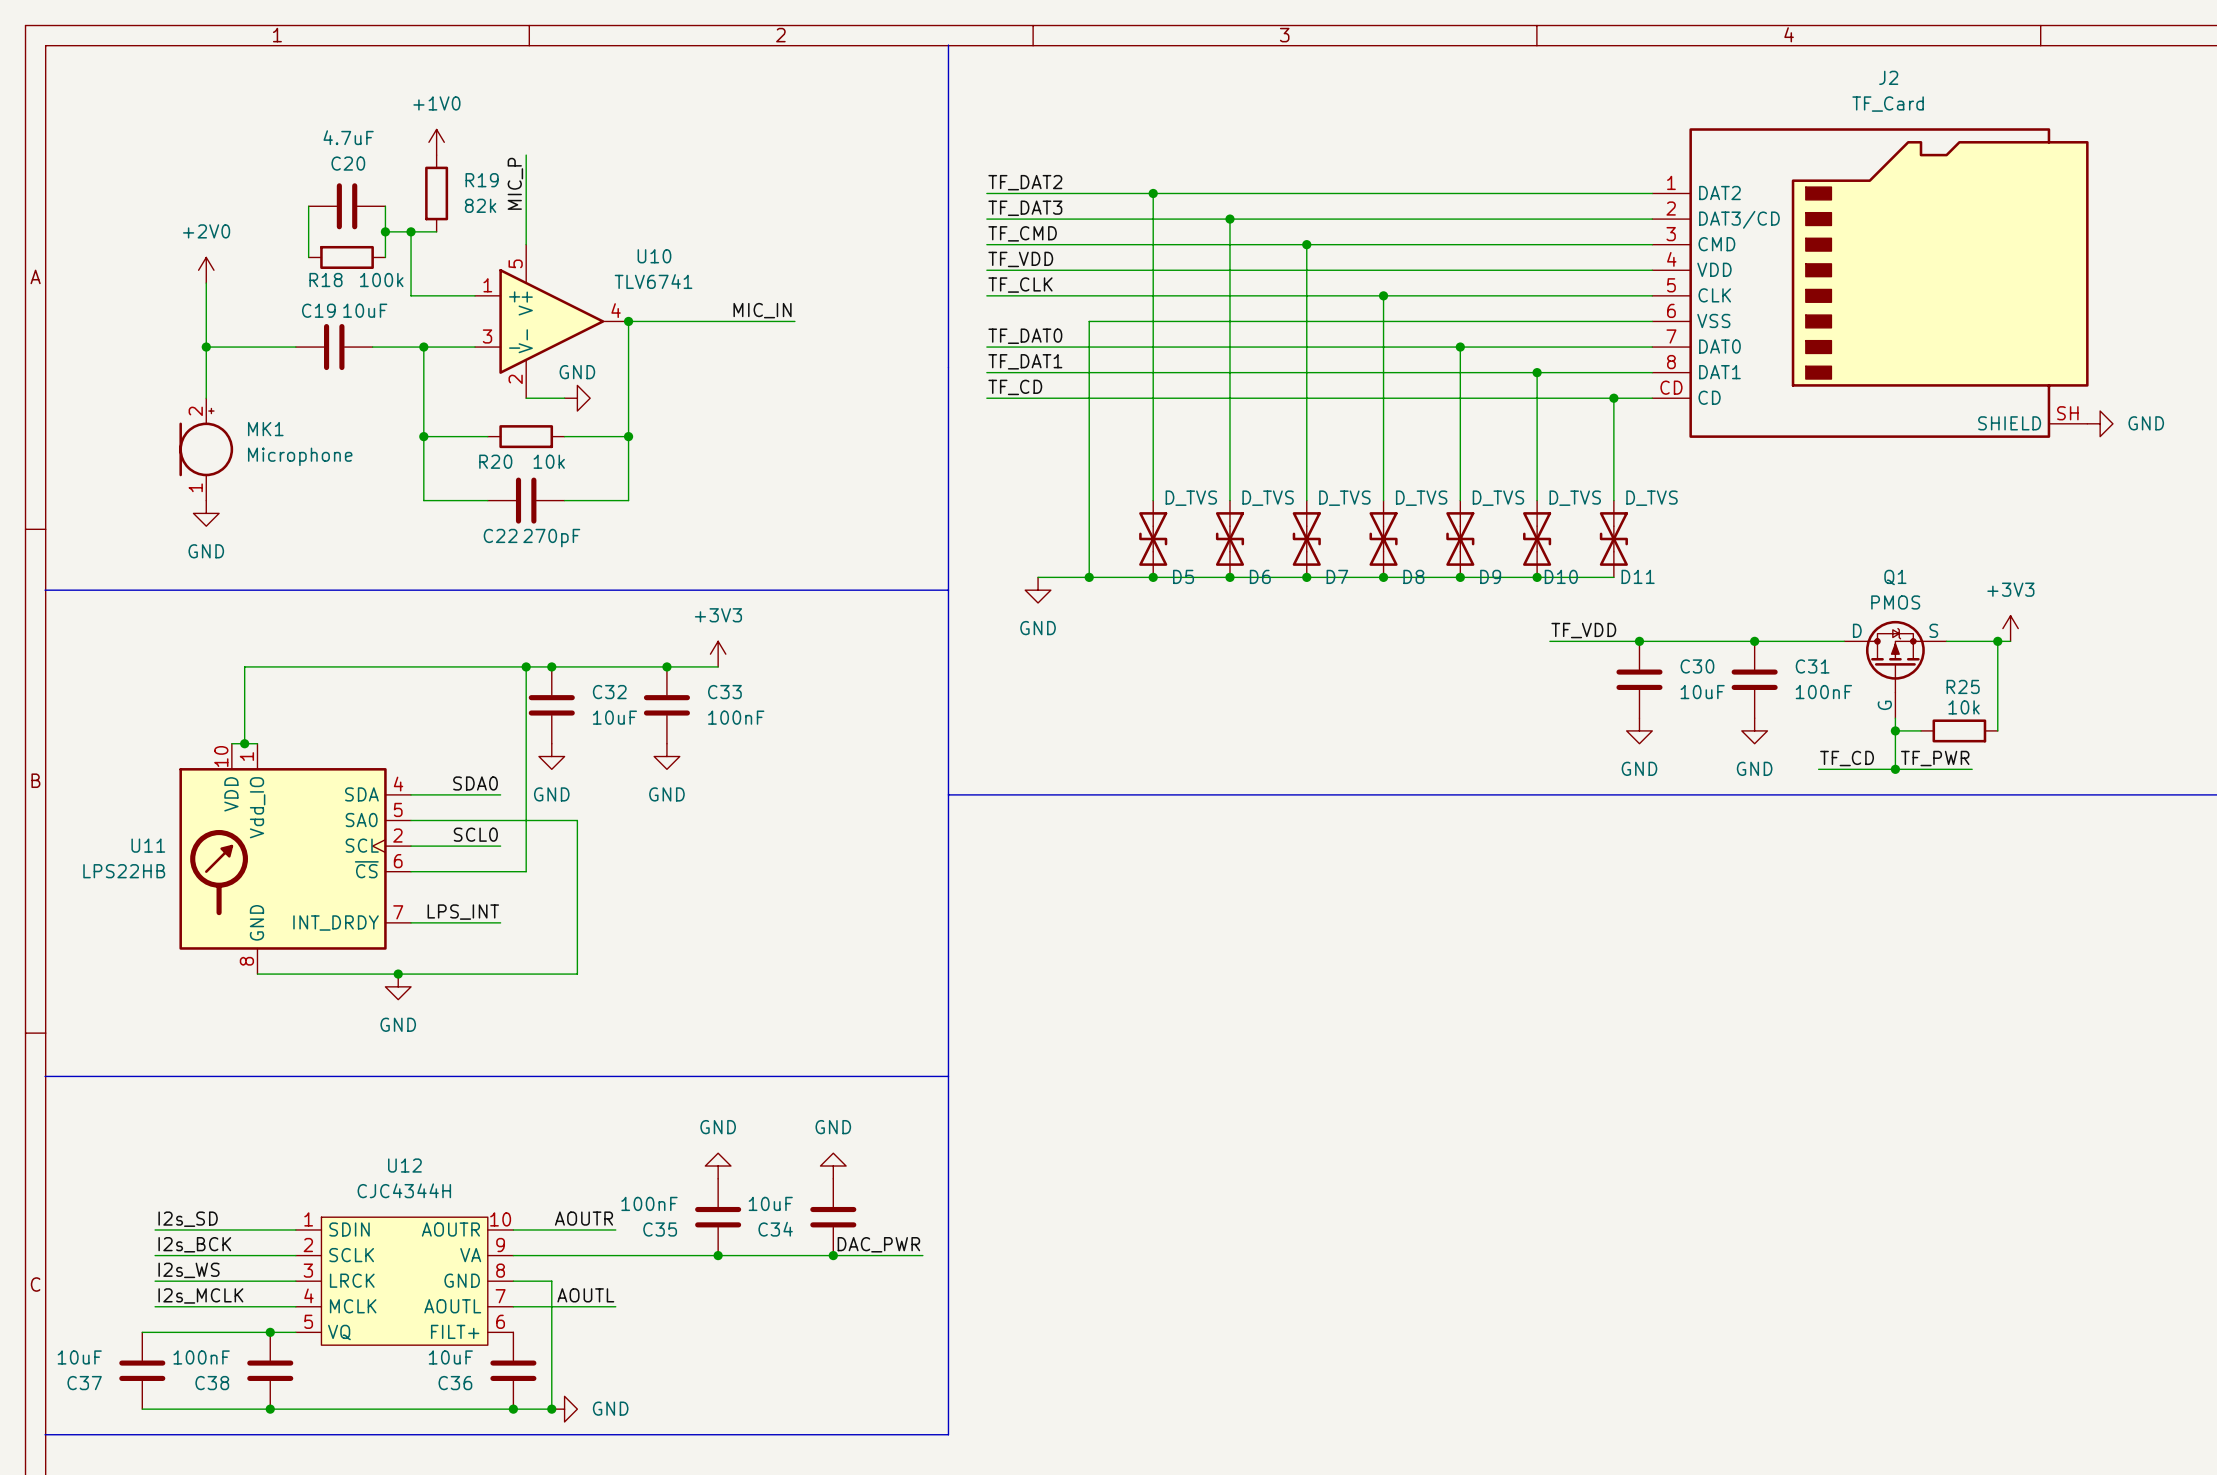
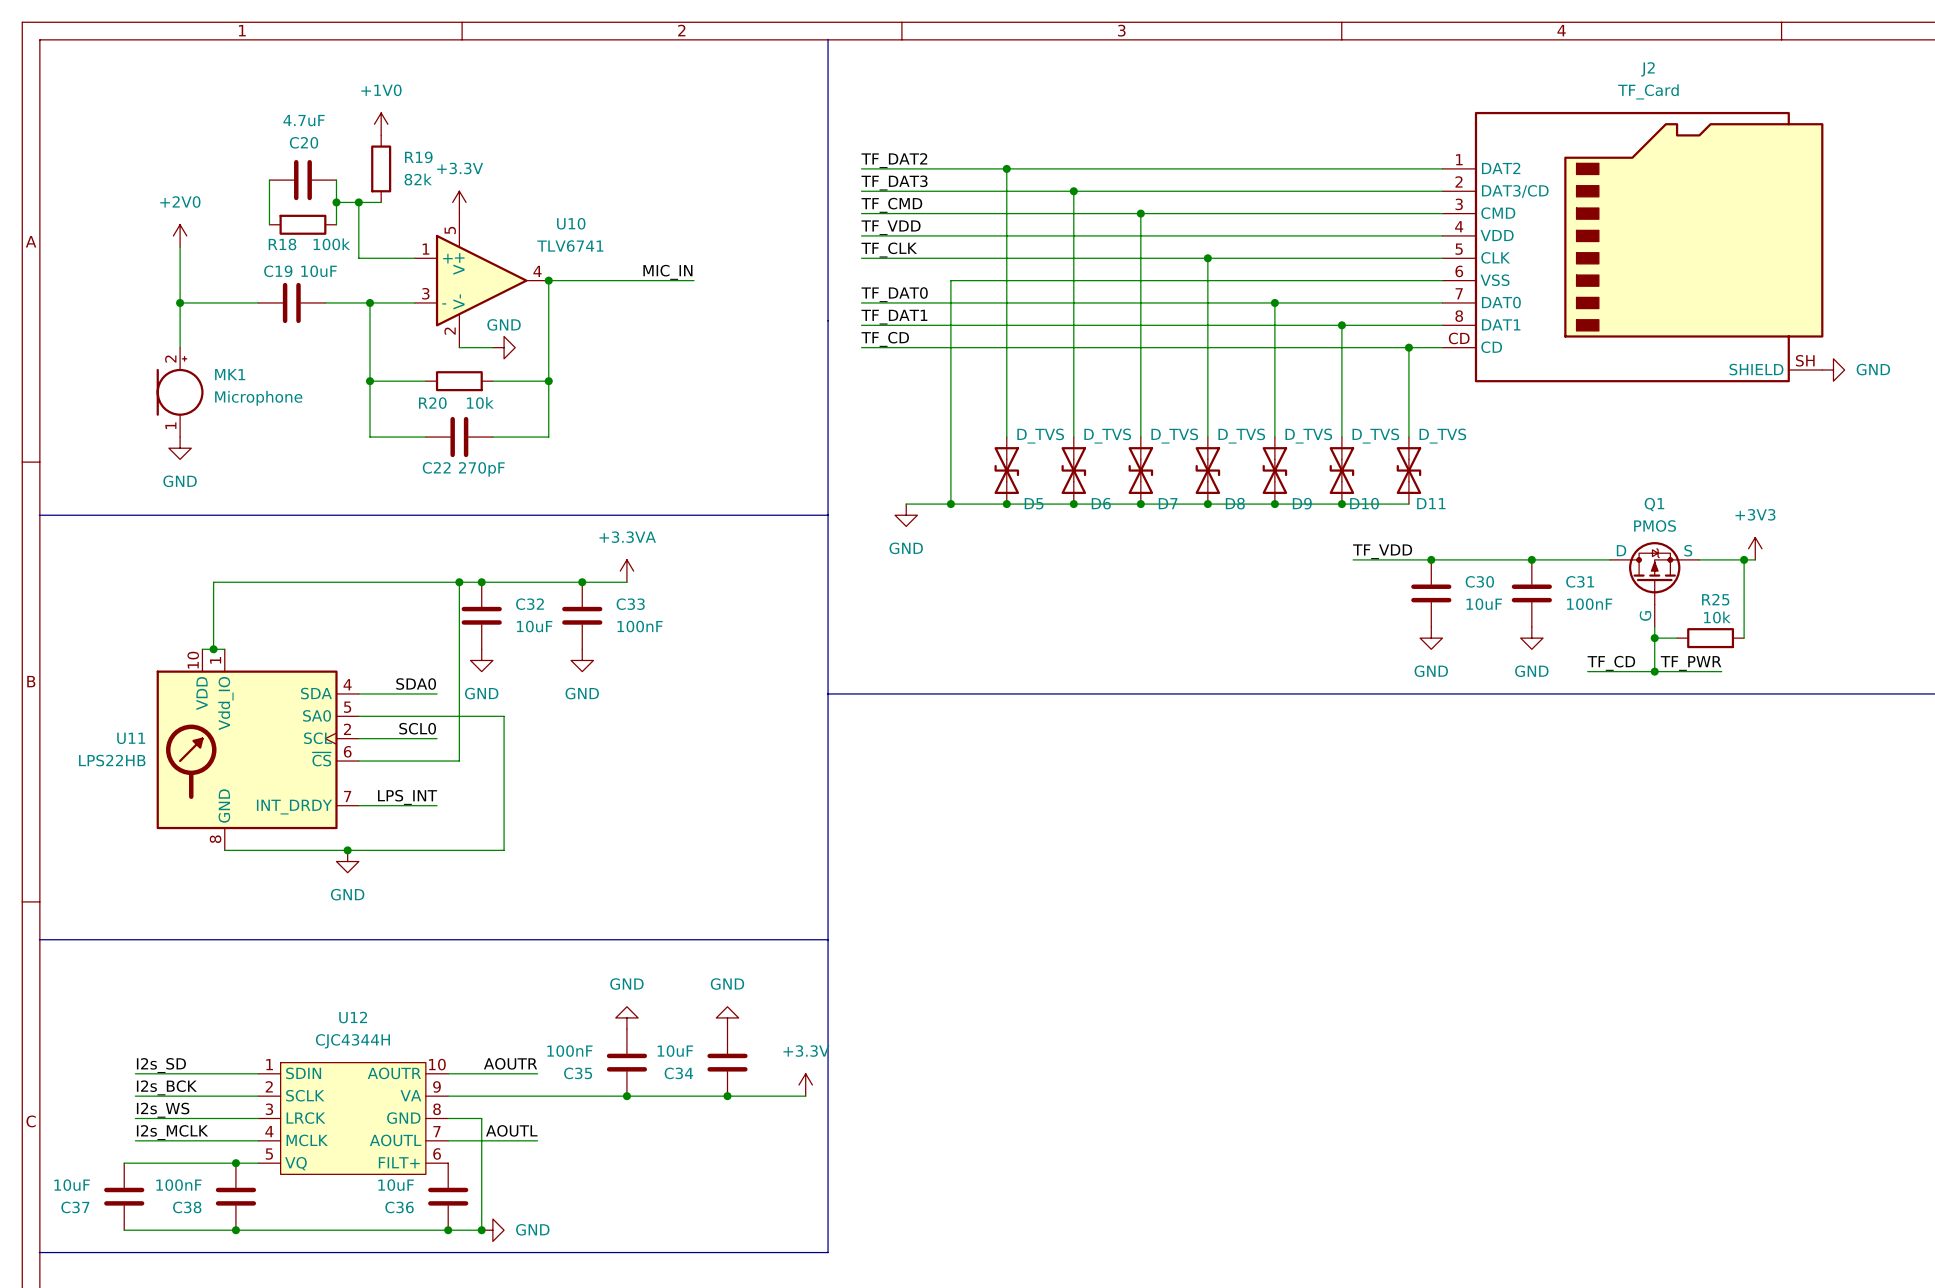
wire: (526, 155) (526, 244) -> none
label: MIC_P (515, 183) -> none
power symbol: none -> +3.3V (459, 202)
power symbol: +3V3 (718, 654) -> +3.3VA (626, 571)
power symbol: none -> +3.3V (805, 1084)
label: DAC_PWR (878, 1244) -> none

